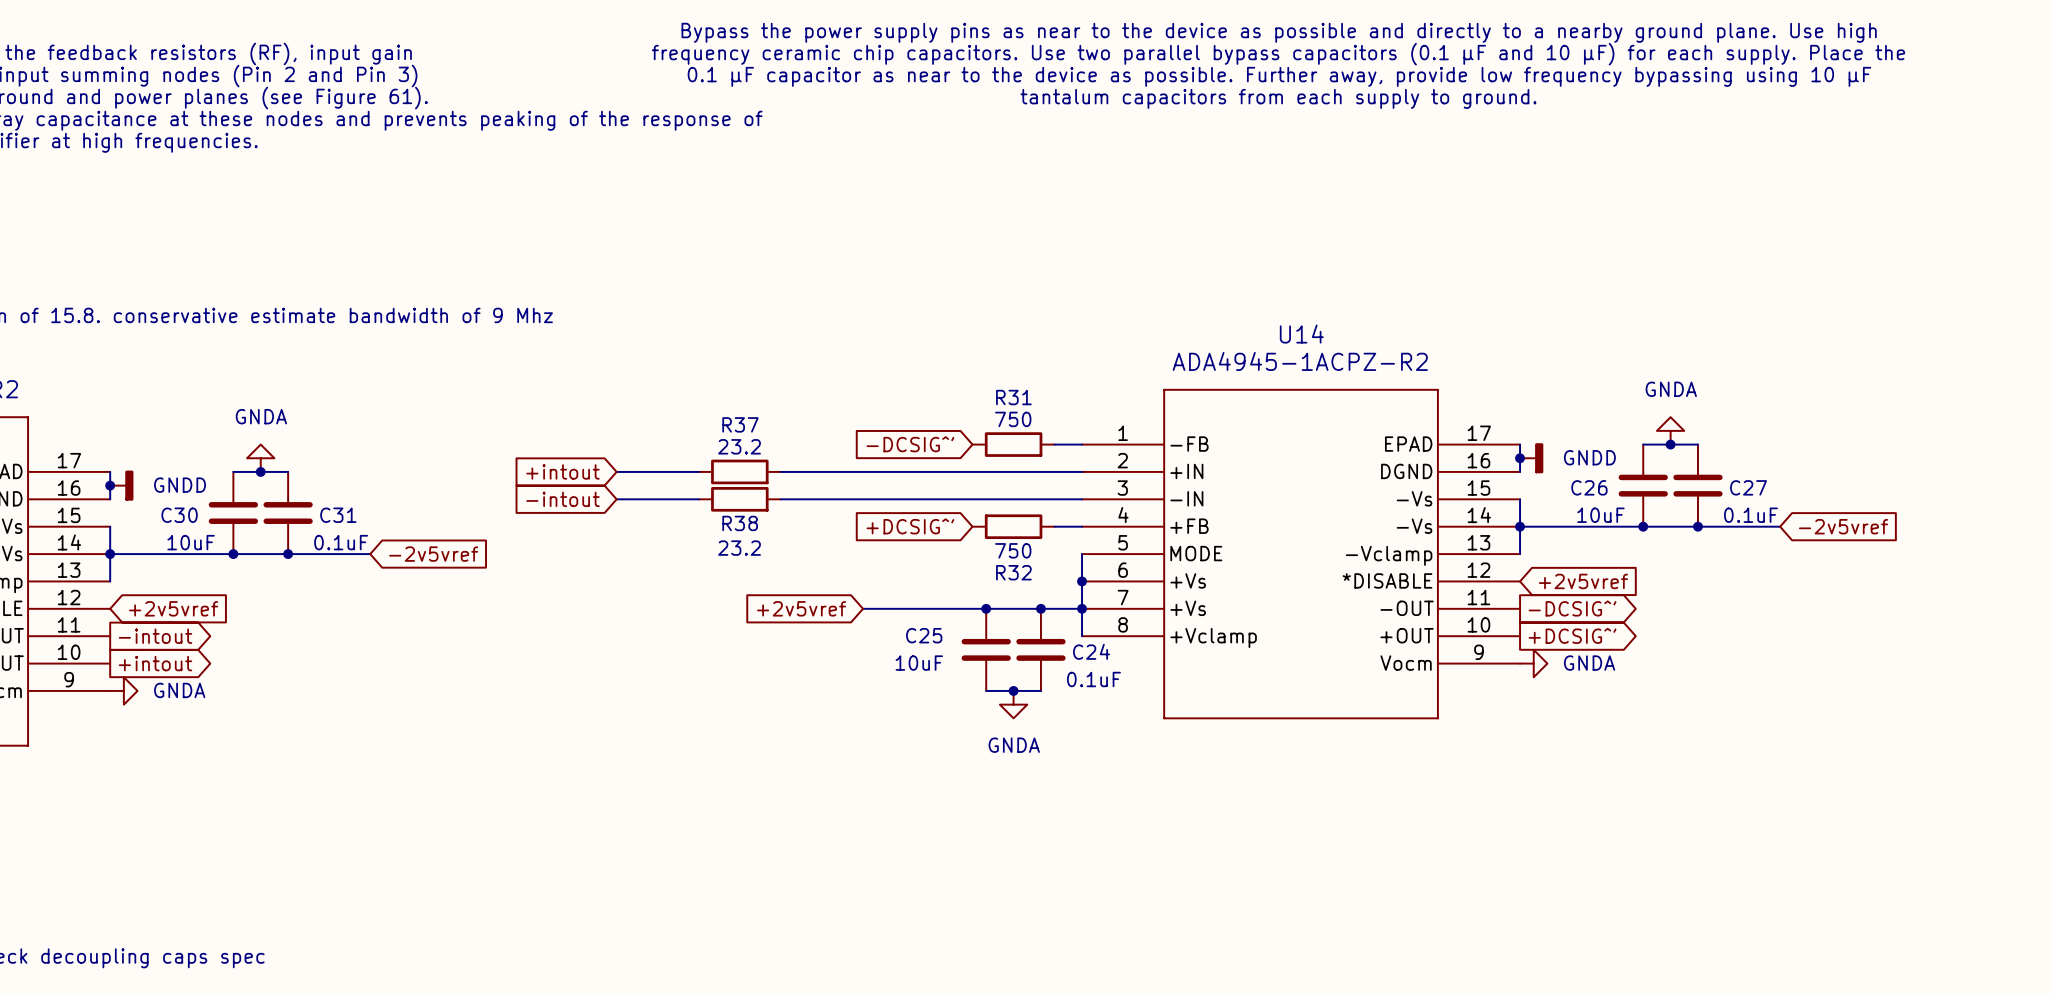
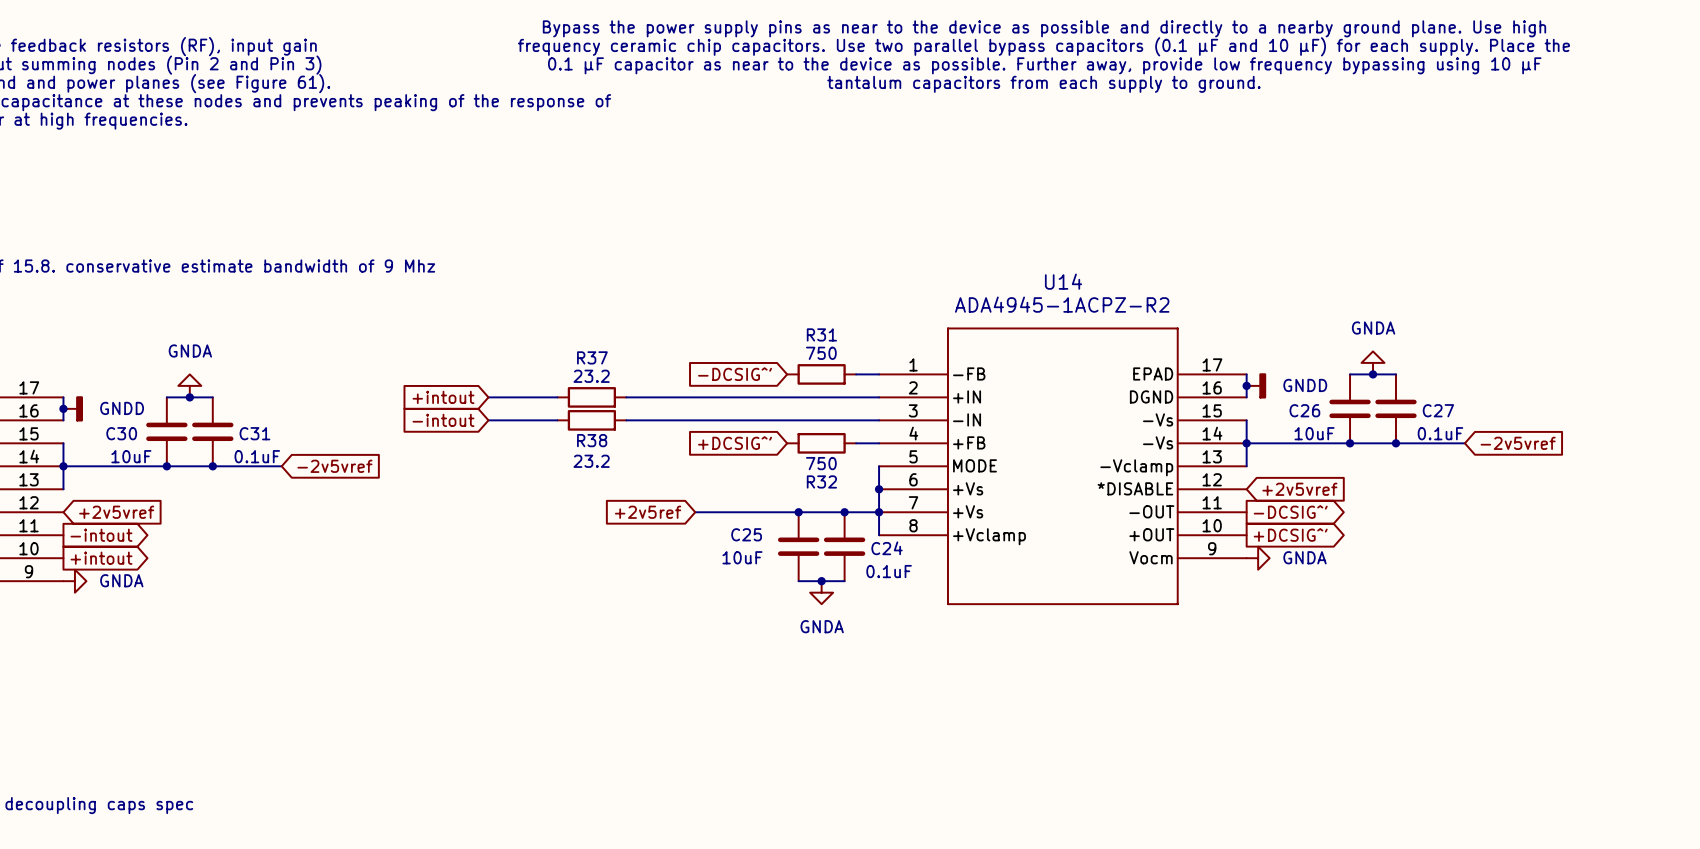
global label: +2v5vref (801, 608) -> +2v5ref (648, 512)

